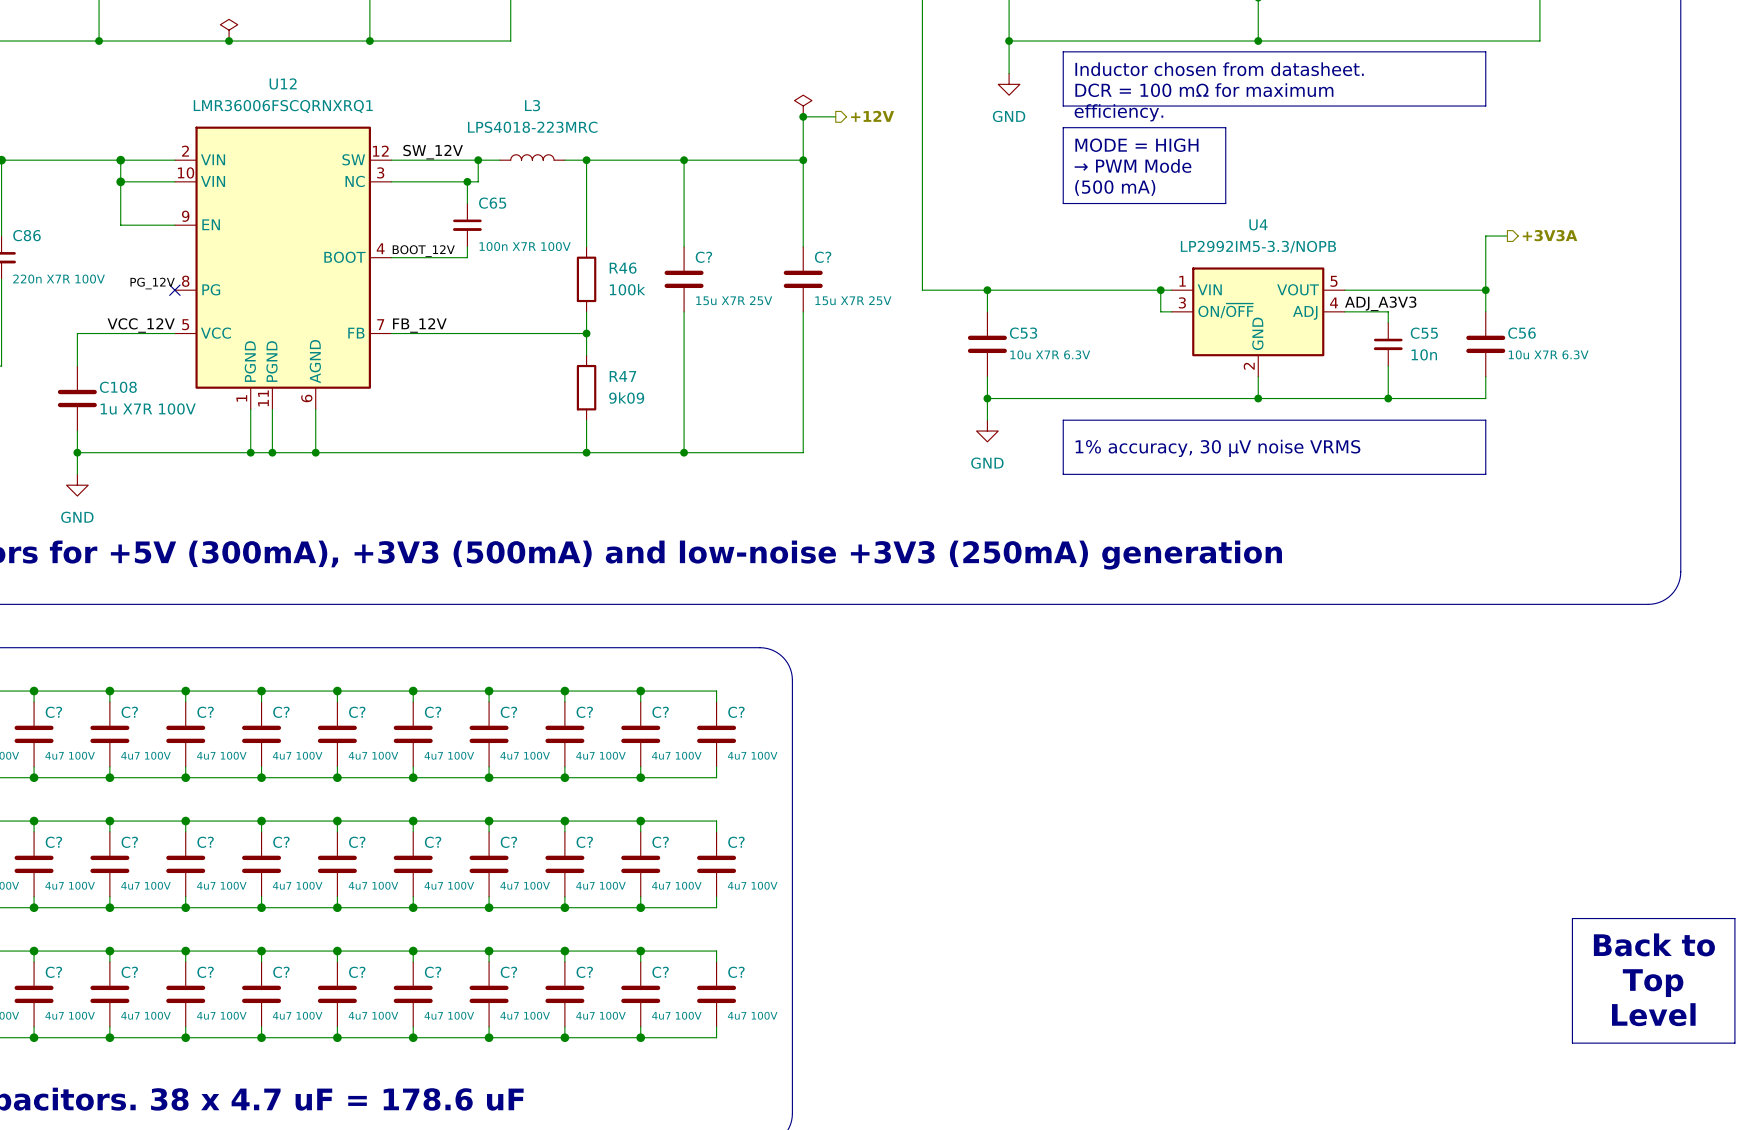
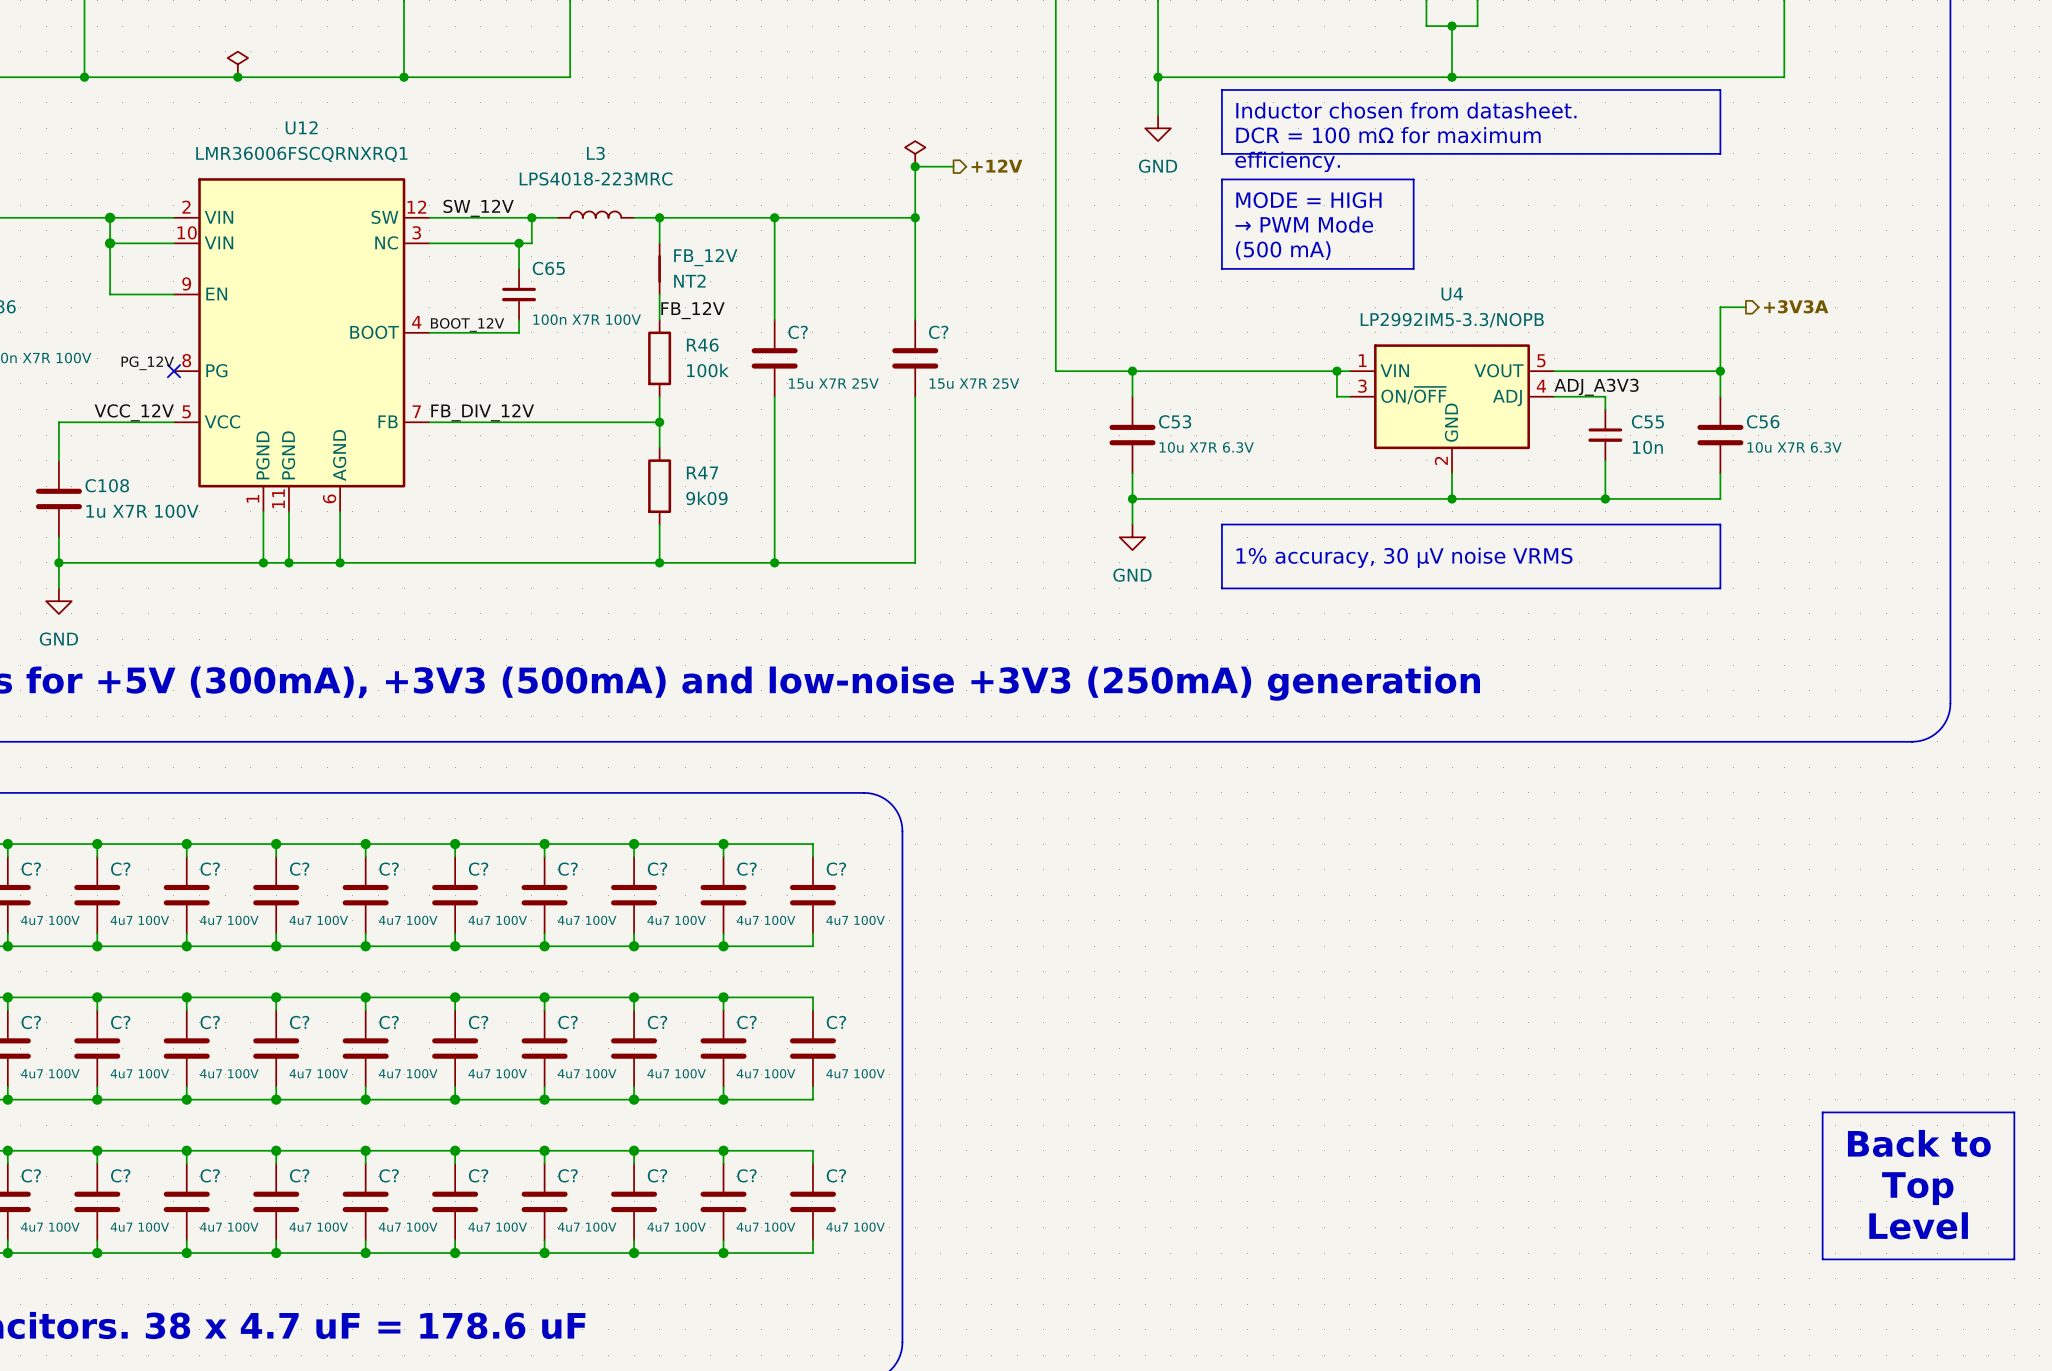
NT2: none -> FB_12V (659, 268)
label: none -> FB_12V (692, 310)
label: FB_12V (419, 325) -> FB_DIV_12V (482, 412)

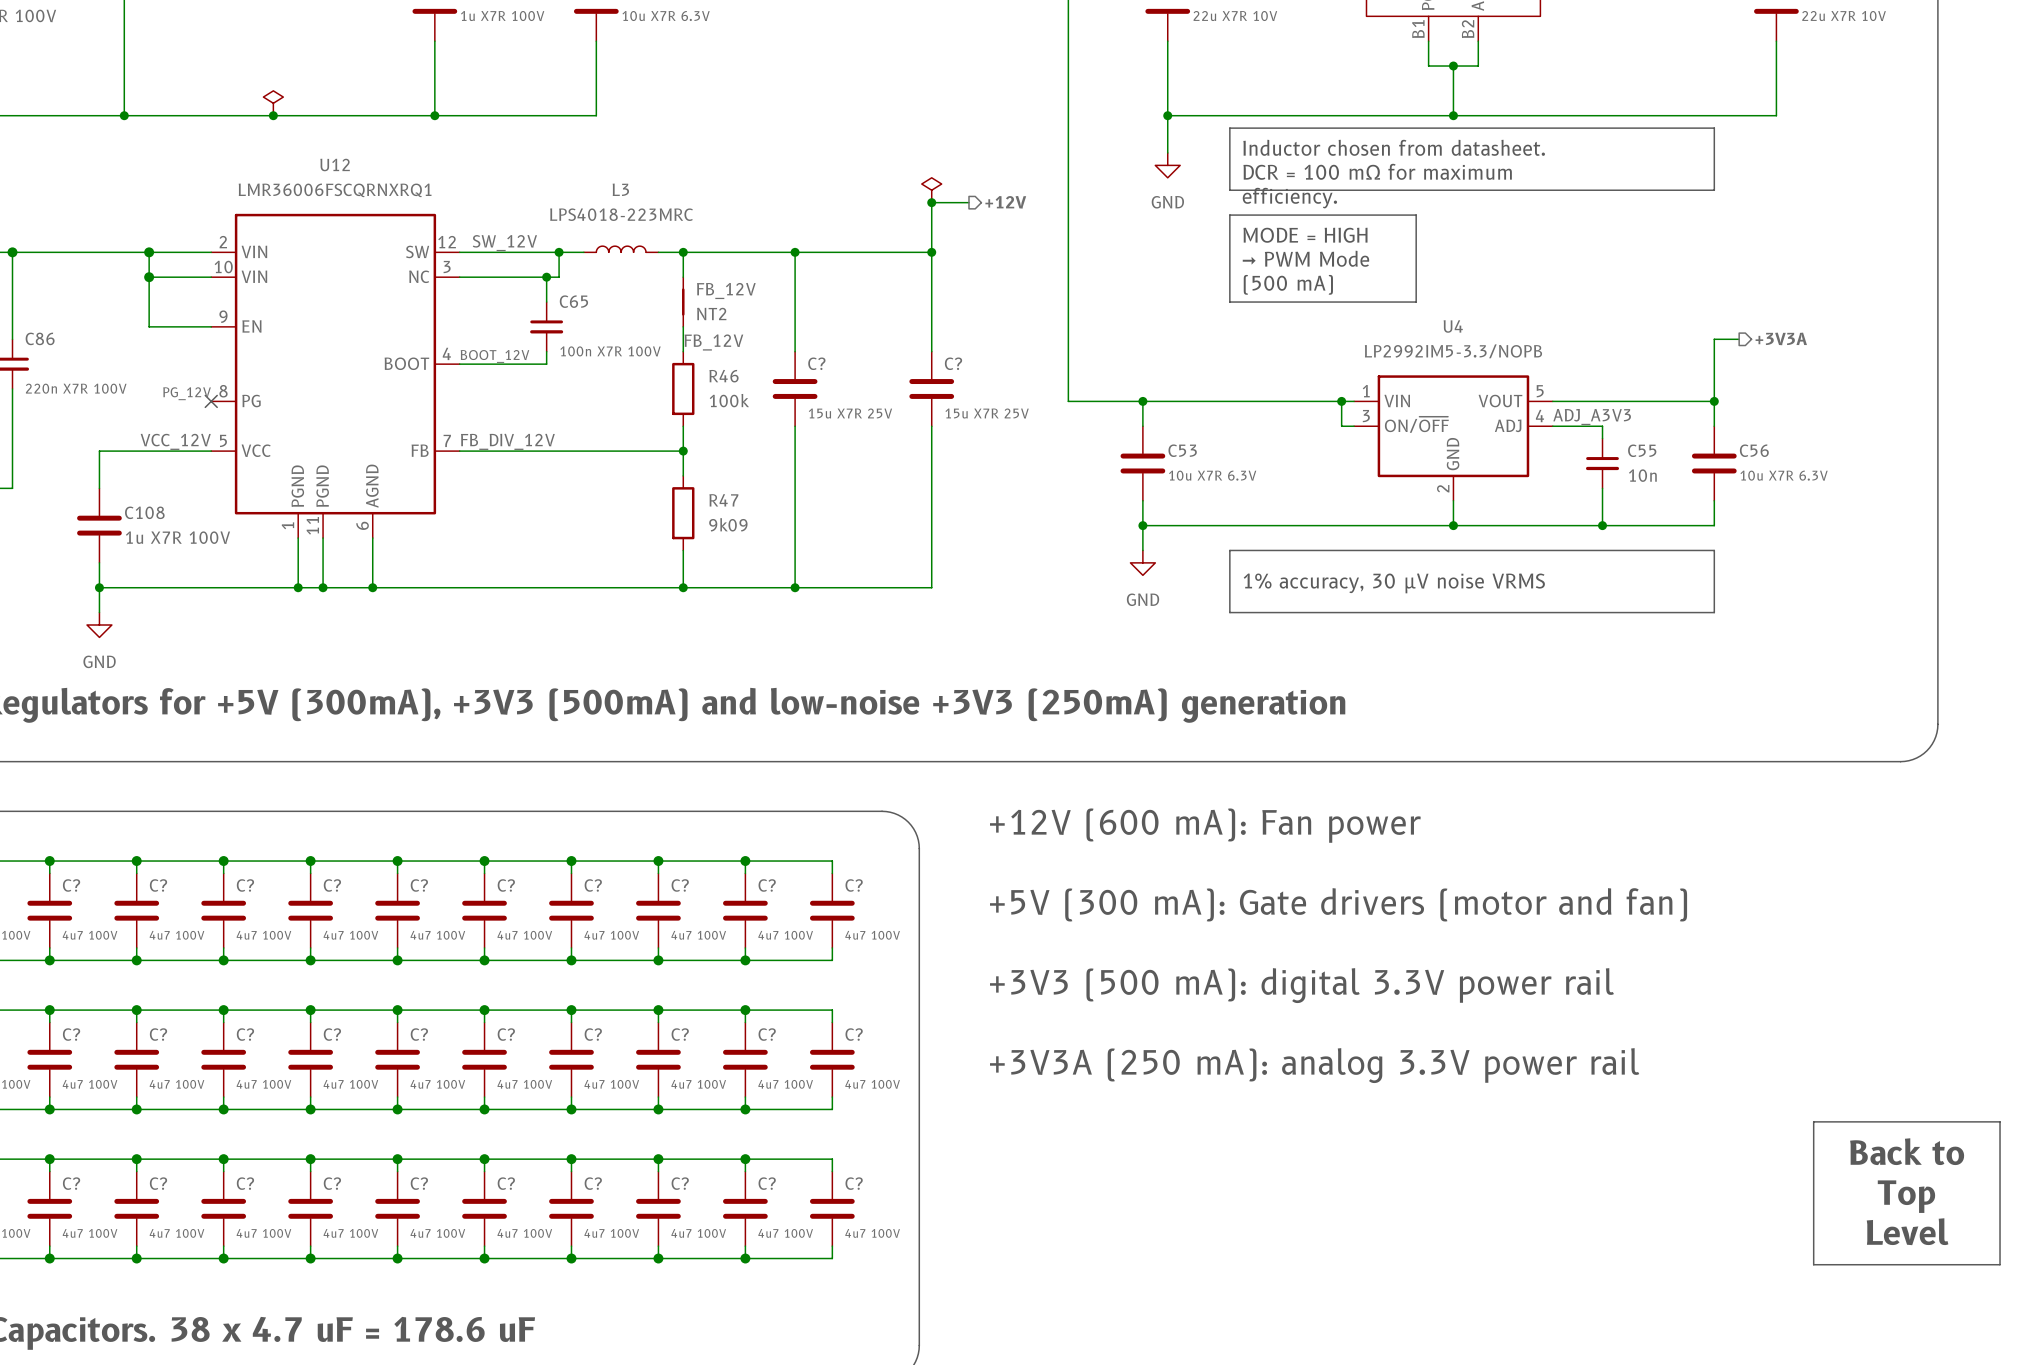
text: none -> +12V (600 mA): Fan power (1205, 825)
text: none -> +5V (300 mA): Gate drivers (motor and fan) (1338, 904)
text: none -> +3V3 (500 mA): digital 3.3V power rail (1301, 985)
text: none -> +3V3A (250 mA): analog 3.3V power rail (1314, 1065)

